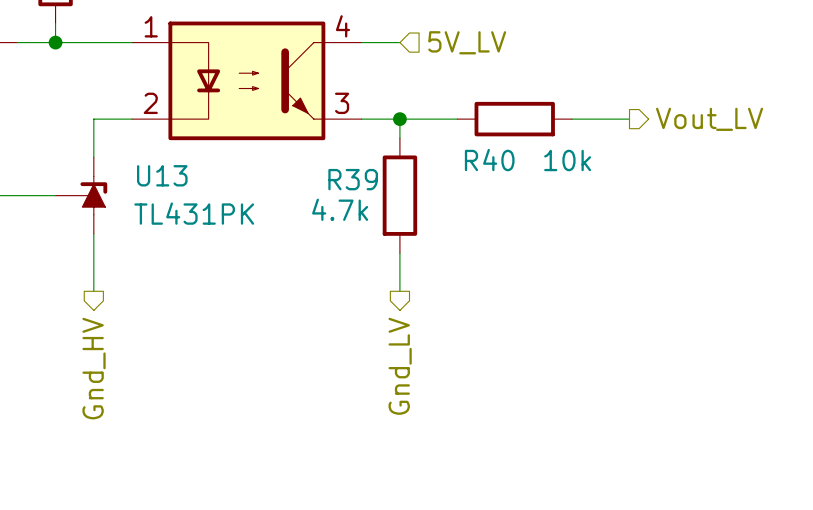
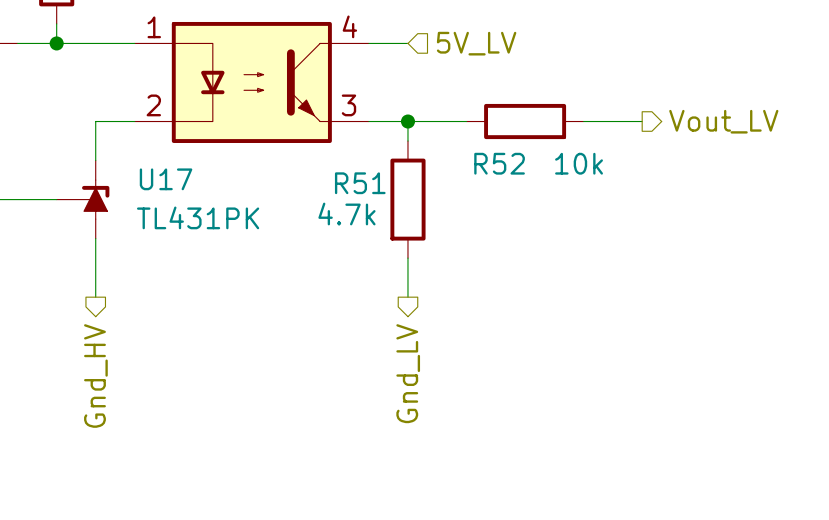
R40 name: R40 (489, 160) -> R52 (499, 163)
U13 name: U13 (162, 175) -> U17 (166, 179)
R39 name: R39 (353, 179) -> R51 (360, 183)

